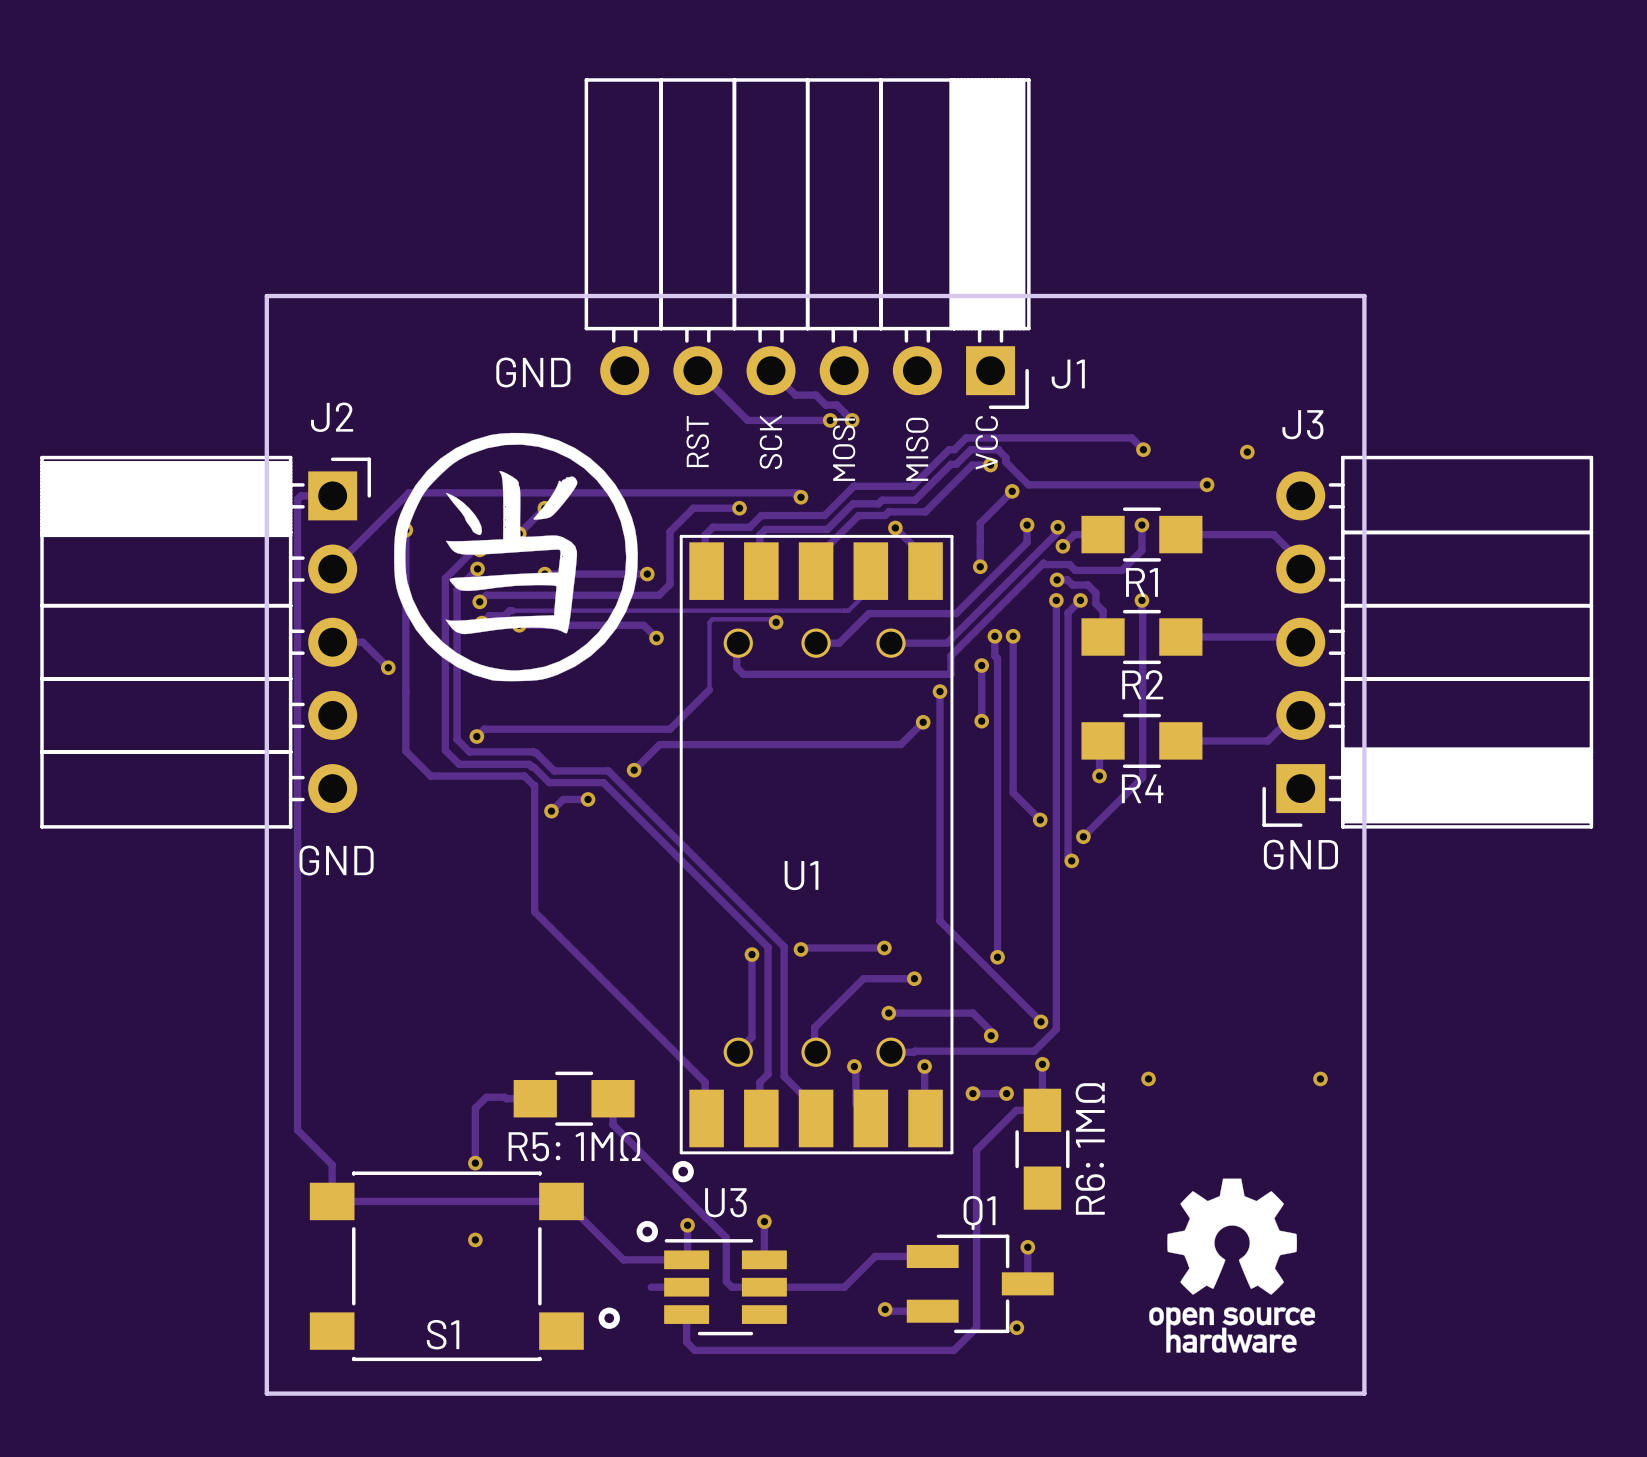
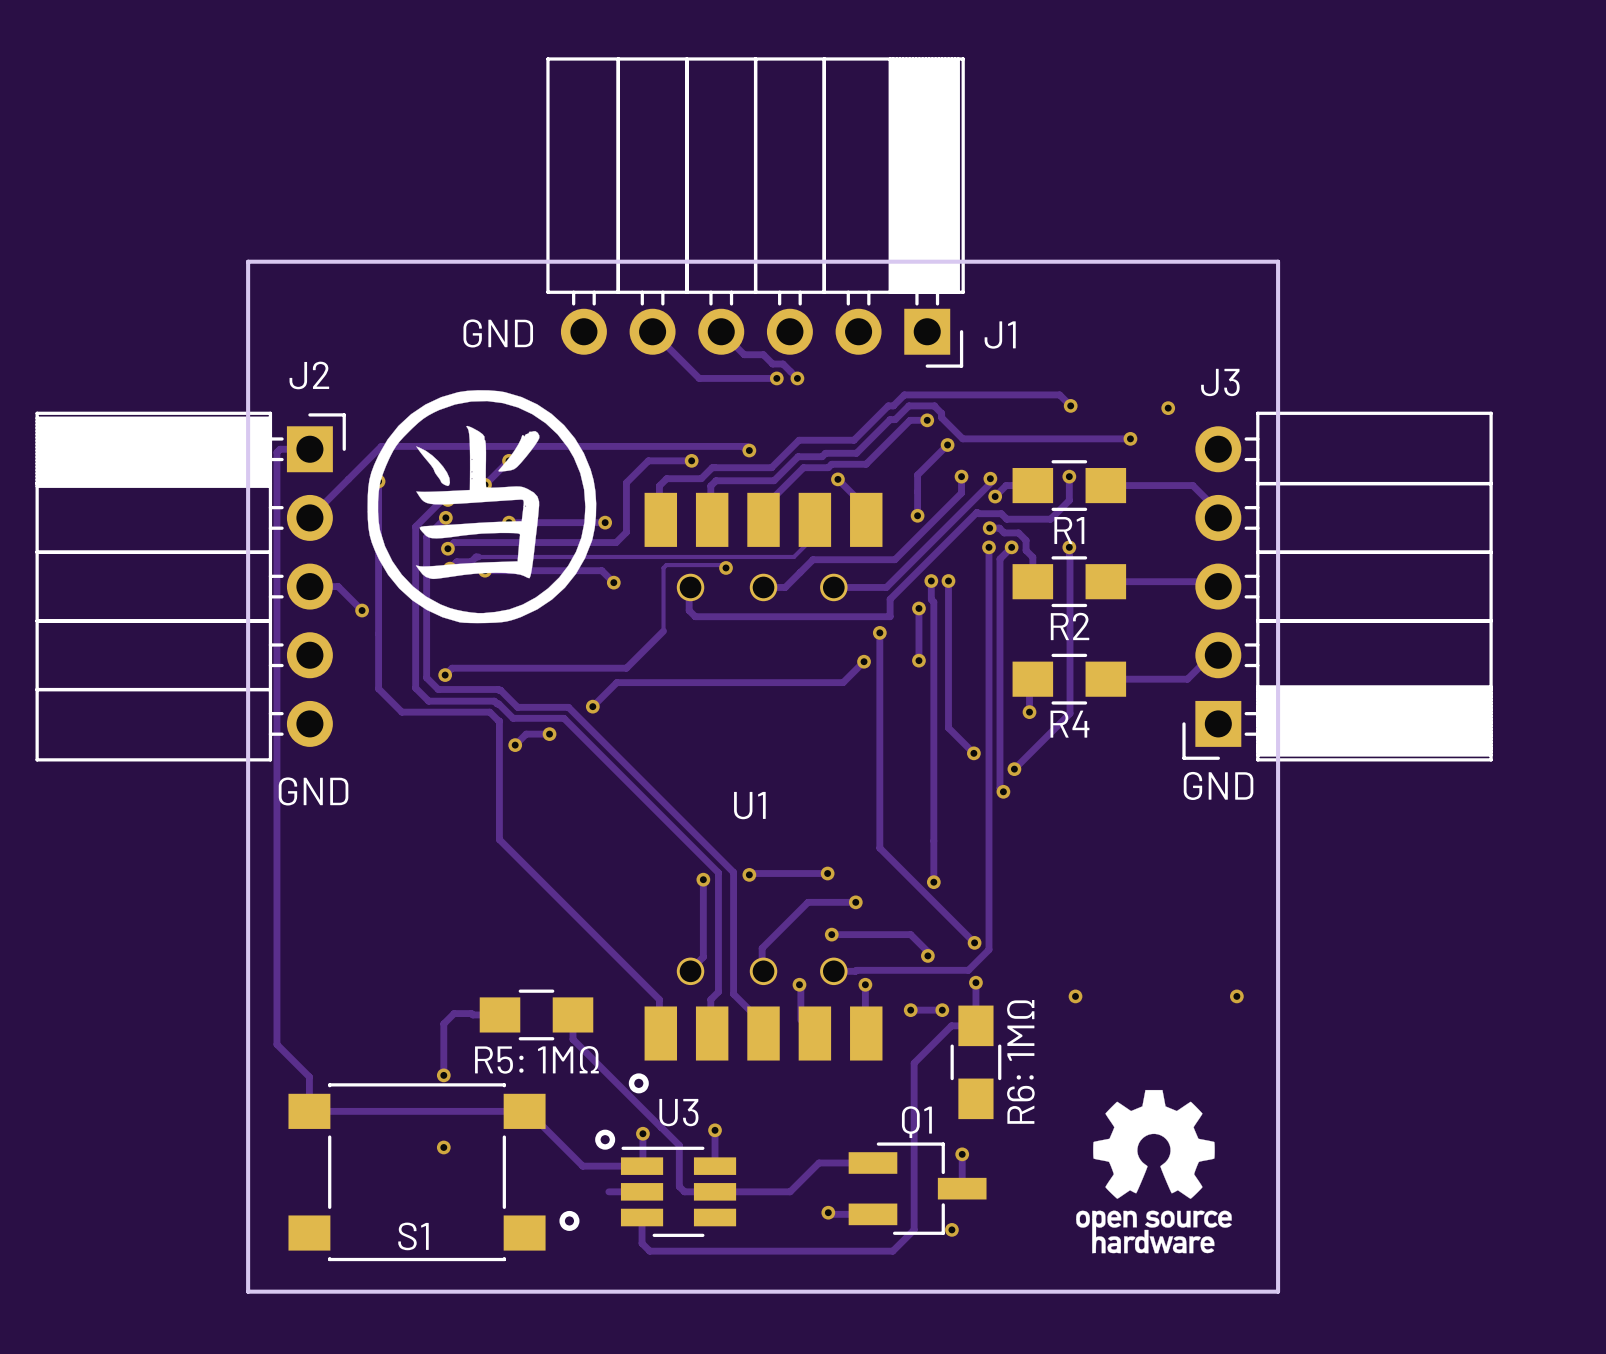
text: RST (697, 441) -> none
text: SCK (770, 441) -> none
text: VCC (986, 442) -> none
text: MOSI (844, 449) -> none
text: MISO (917, 449) -> none
U1 footprint: [679, 534, 954, 1155] -> [644, 492, 883, 1061]

